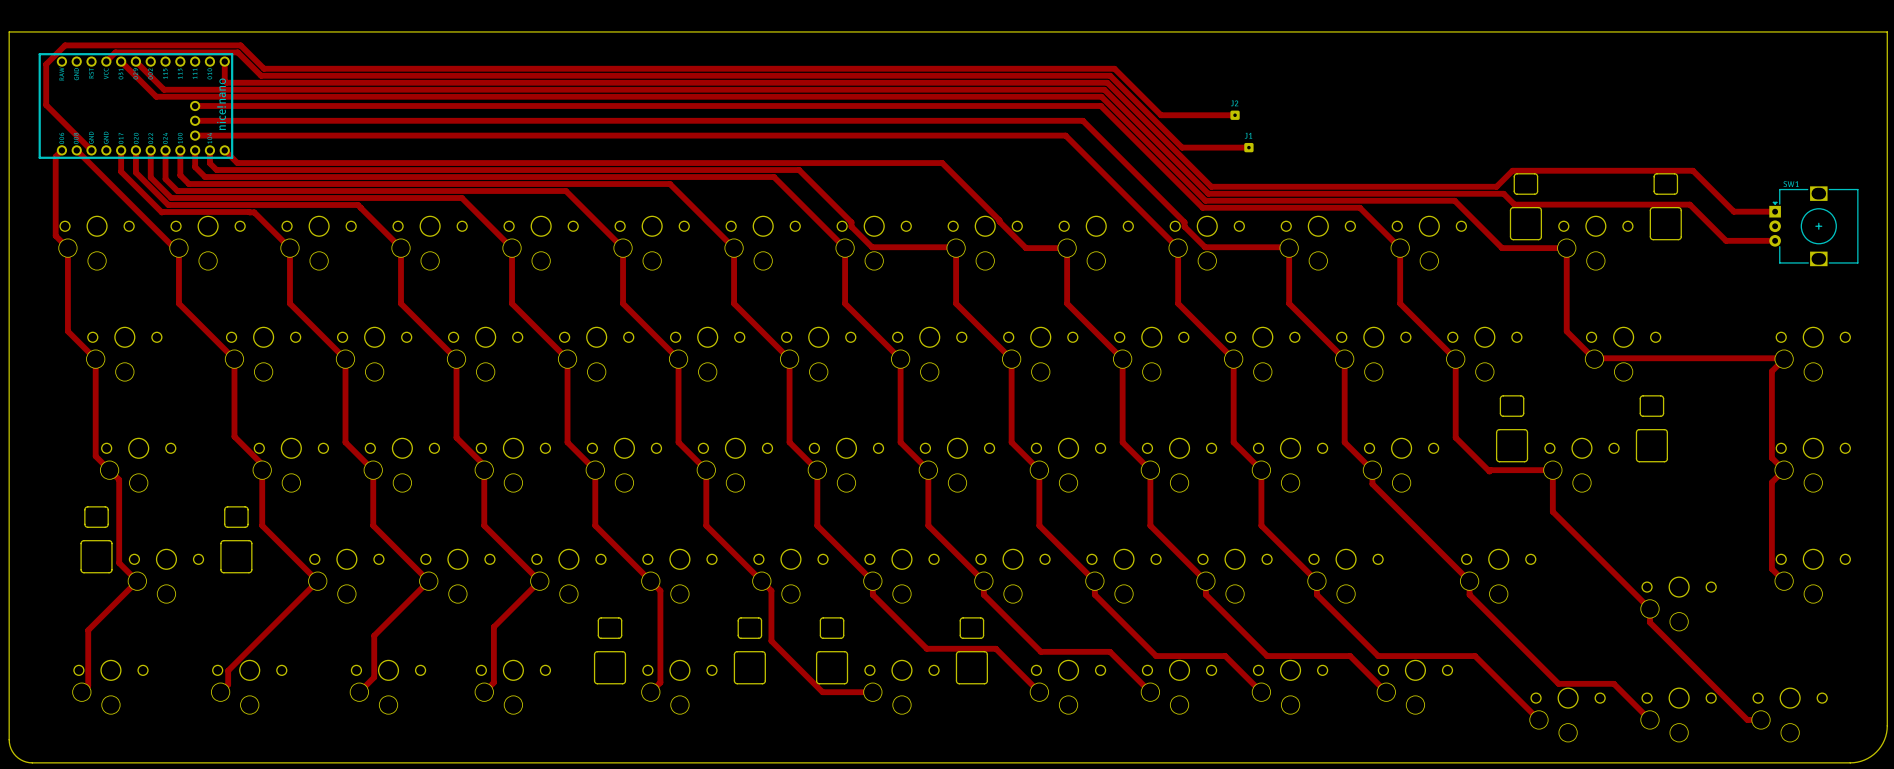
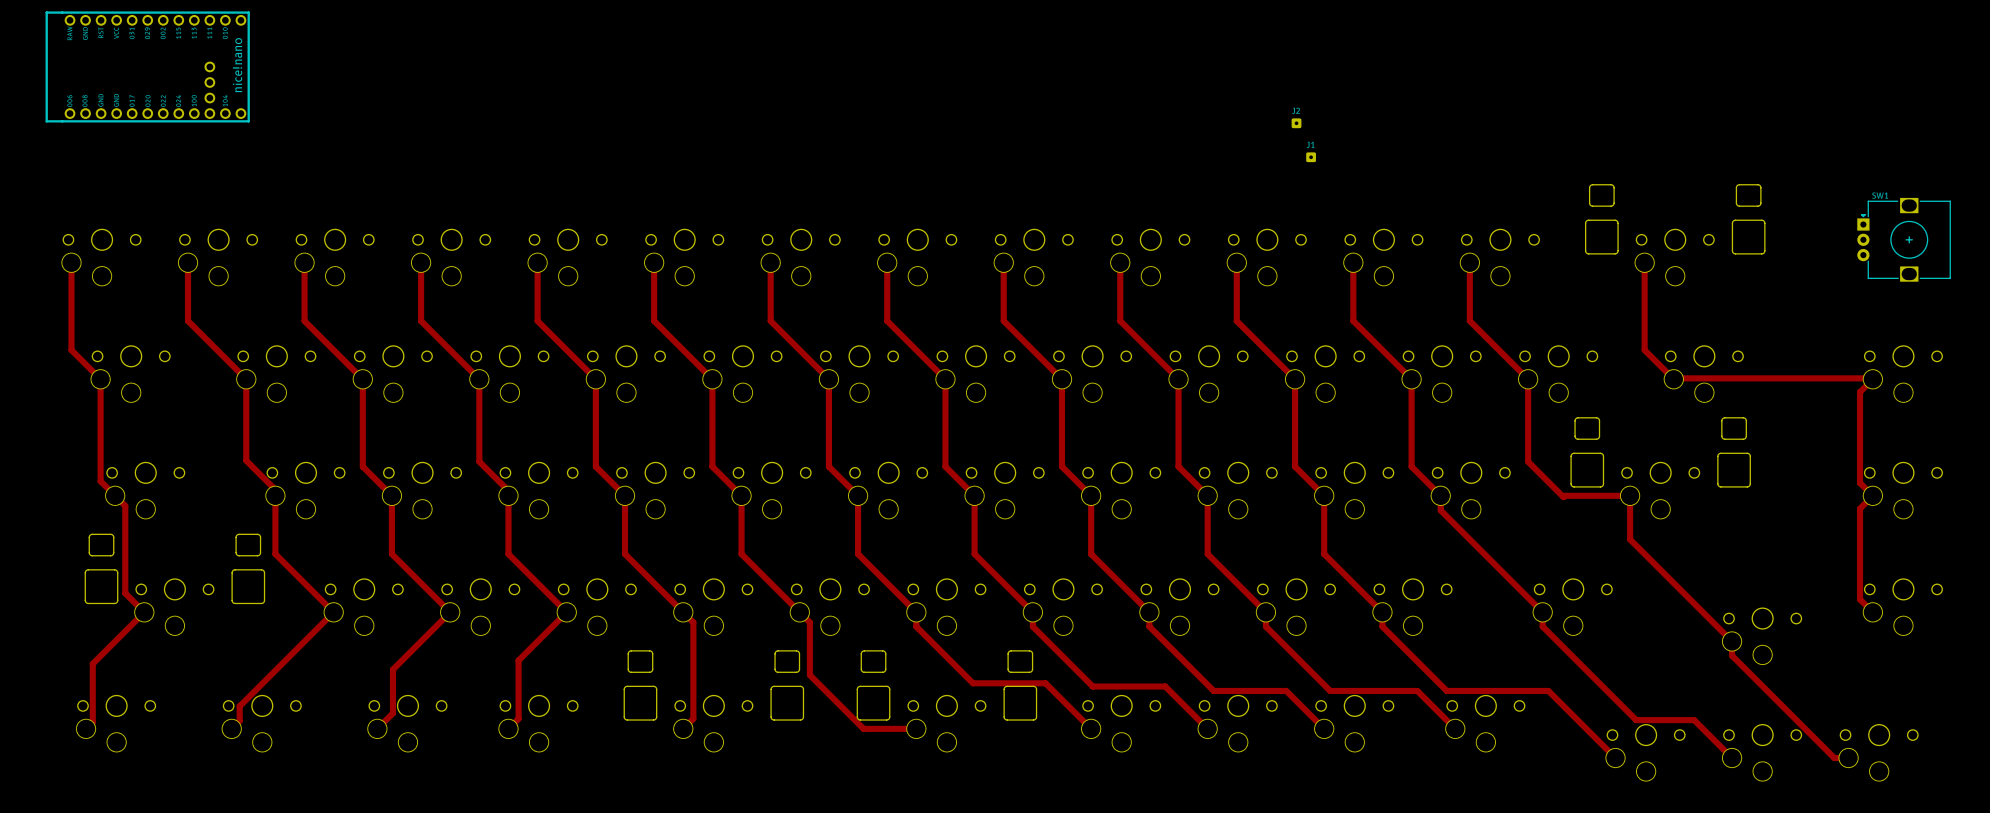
board edge: (9, 31) (1887, 31) (1887, 725) (1884, 740) (1878, 749) (1870, 756) (1861, 761) (1850, 762) (32, 762) (23, 761) (13, 753) (9, 739) (9, 31) -> none
track: (106, 61) (115, 52) (237, 52) (261, 75) (1110, 75) (1182, 147) (1248, 147) -> none
track: (121, 61) (156, 96) (1101, 96) (1205, 200) (1454, 200) (1502, 248) (1566, 248) -> none
track: (135, 61) (164, 89) (1104, 89) (1208, 193) (1503, 193) (1514, 204) (1689, 204) (1726, 240) (1775, 240) -> none
track: (224, 61) (224, 80) (226, 82) (1107, 82) (1211, 186) (1496, 186) (1512, 170) (1693, 170) (1733, 211) (1775, 211) -> none
part position: (135, 105) -> (147, 66)
track: (195, 105) (1100, 105) (1202, 207) (1359, 207) (1400, 248) -> none
track: (1235, 115) (1161, 115) (1114, 68) (264, 68) (240, 45) (65, 45) (46, 64) (46, 105) (91, 150) -> none
track: (195, 120) (1082, 120) (1184, 222) (1184, 226) (1205, 247) (1289, 248) -> none
track: (195, 135) (1065, 135) (1178, 248) -> none
track: (61, 150) (55, 156) (55, 235) (67, 248) -> none
track: (76, 150) (174, 248) (178, 248) -> none
track: (121, 150) (121, 171) (161, 212) (254, 212) (289, 248) -> none
track: (135, 150) (135, 172) (168, 204) (357, 204) (360, 207) -> none
track: (150, 150) (150, 177) (171, 198) (461, 198) (512, 248) -> none
track: (165, 150) (165, 179) (177, 191) (565, 191) (623, 248) -> none
track: (180, 150) (180, 175) (188, 184) (669, 184) (734, 248) -> none
track: (195, 150) (195, 167) (205, 177) (773, 177) (845, 248) -> none
track: (209, 150) (209, 163) (216, 170) (799, 170) (851, 222) (851, 226) (872, 247) (956, 248) -> none
track: (224, 150) (237, 163) (942, 163) (1025, 248) (1067, 248) -> none
track: (360, 207) (401, 248) -> none

